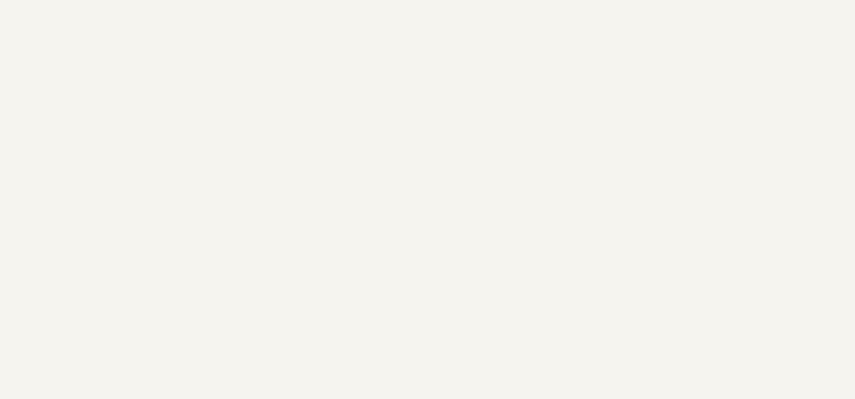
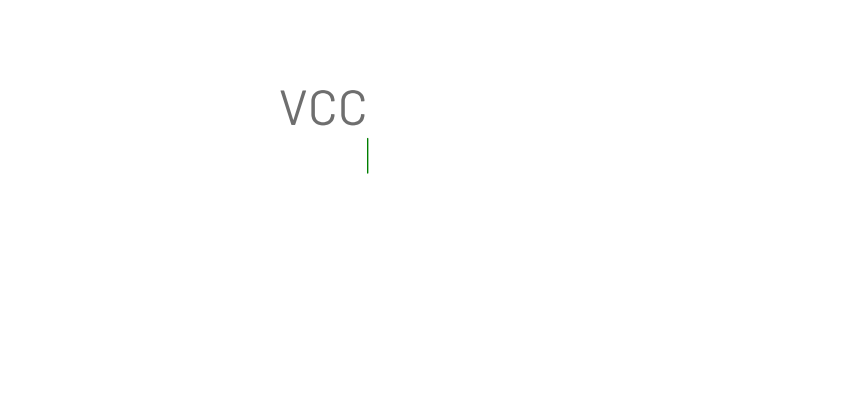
label: none -> VCC (322, 107)
wire: none -> (367, 138) (367, 173)

